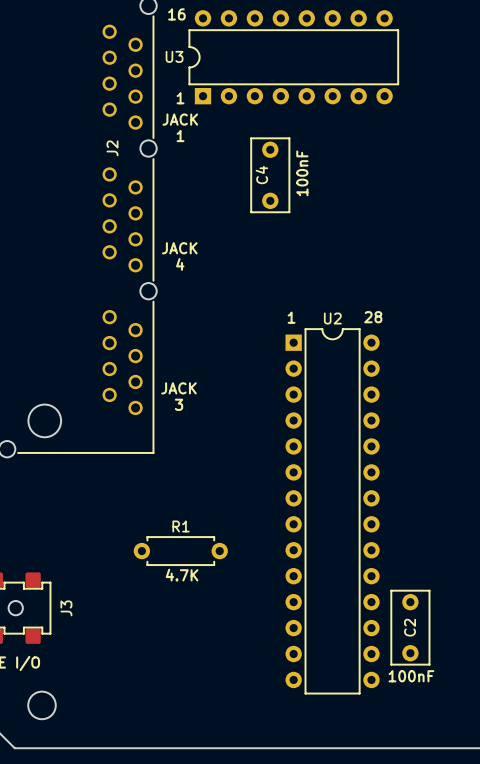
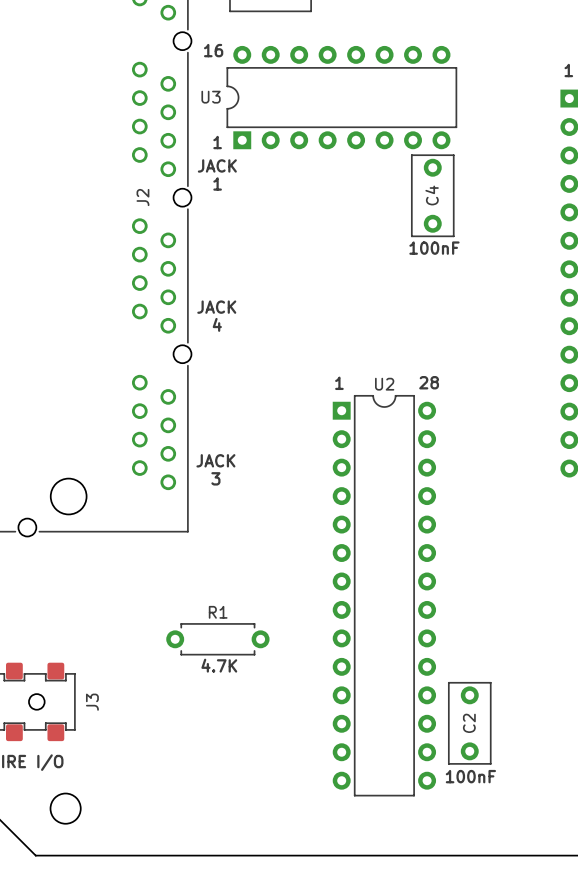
text rotation: 0° (302, 173) -> 90° clockwise (434, 248)
text position: 100nF (302, 173) -> 100nF (434, 248)
C4 name position: C4 (261, 175) -> C4 (432, 195)
C4 position: (270, 175) -> (432, 195)

